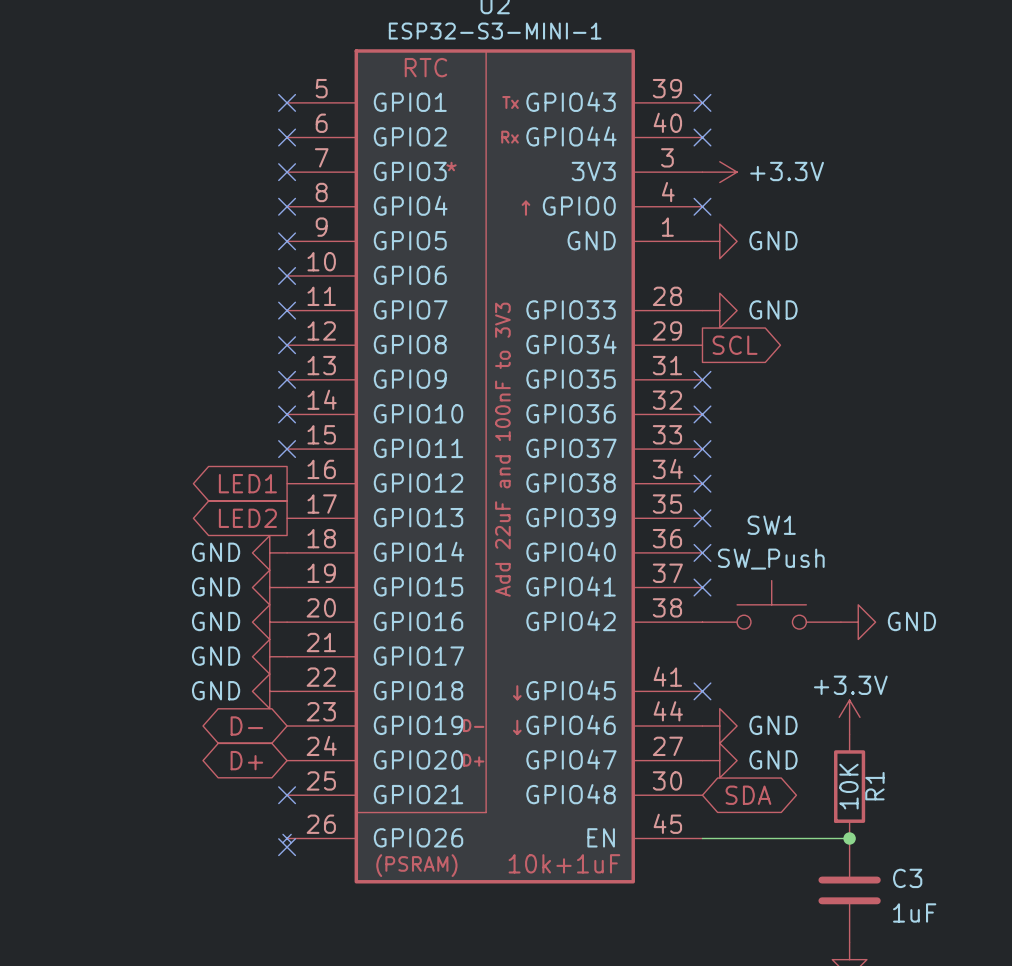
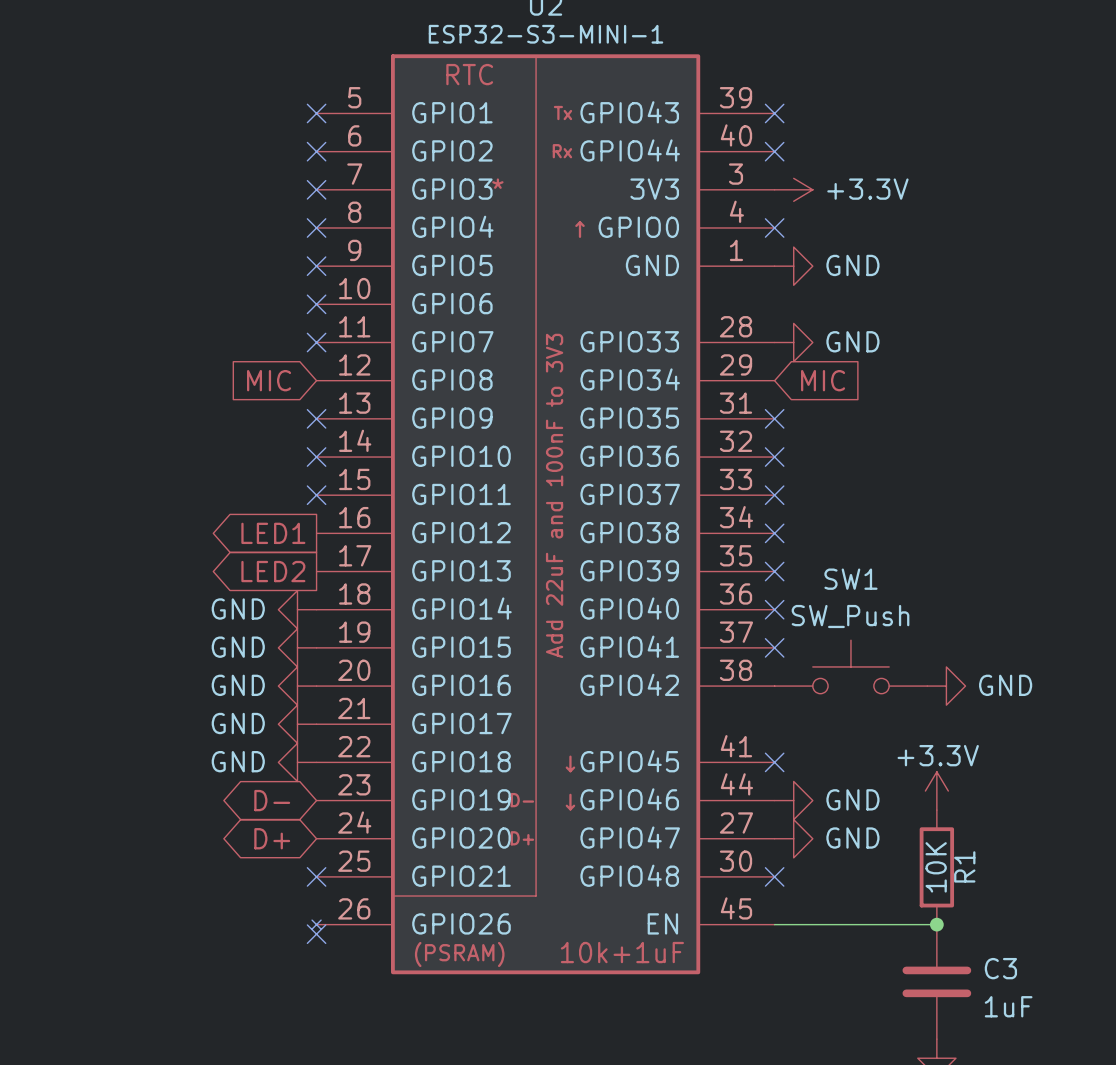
global label: none -> MIC (269, 380)
no-connect mark: (287, 345) -> none
global label shape: output (735, 345) -> input (823, 380)
global label: SCL (735, 345) -> MIC (823, 380)
no-connect mark: none -> (774, 876)
global label: SDA (748, 795) -> none

